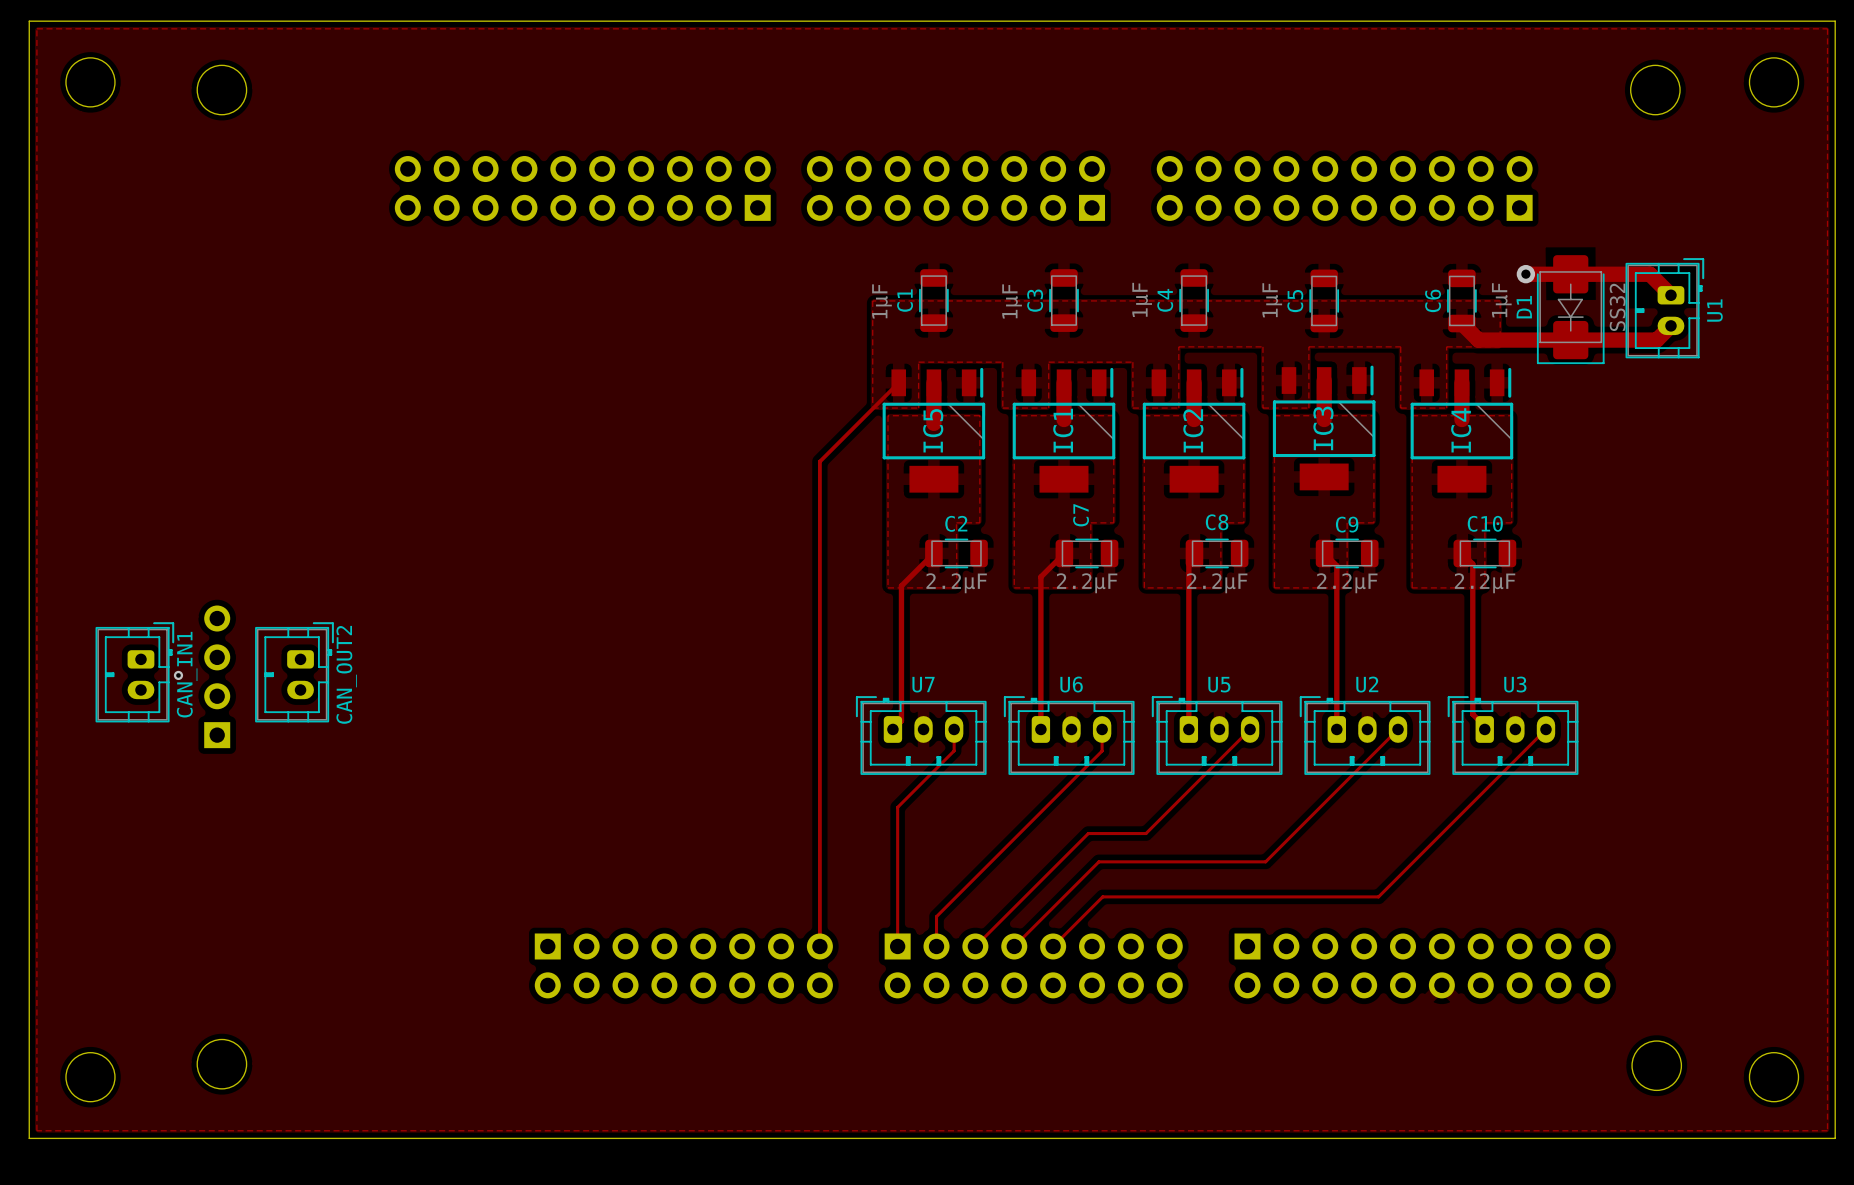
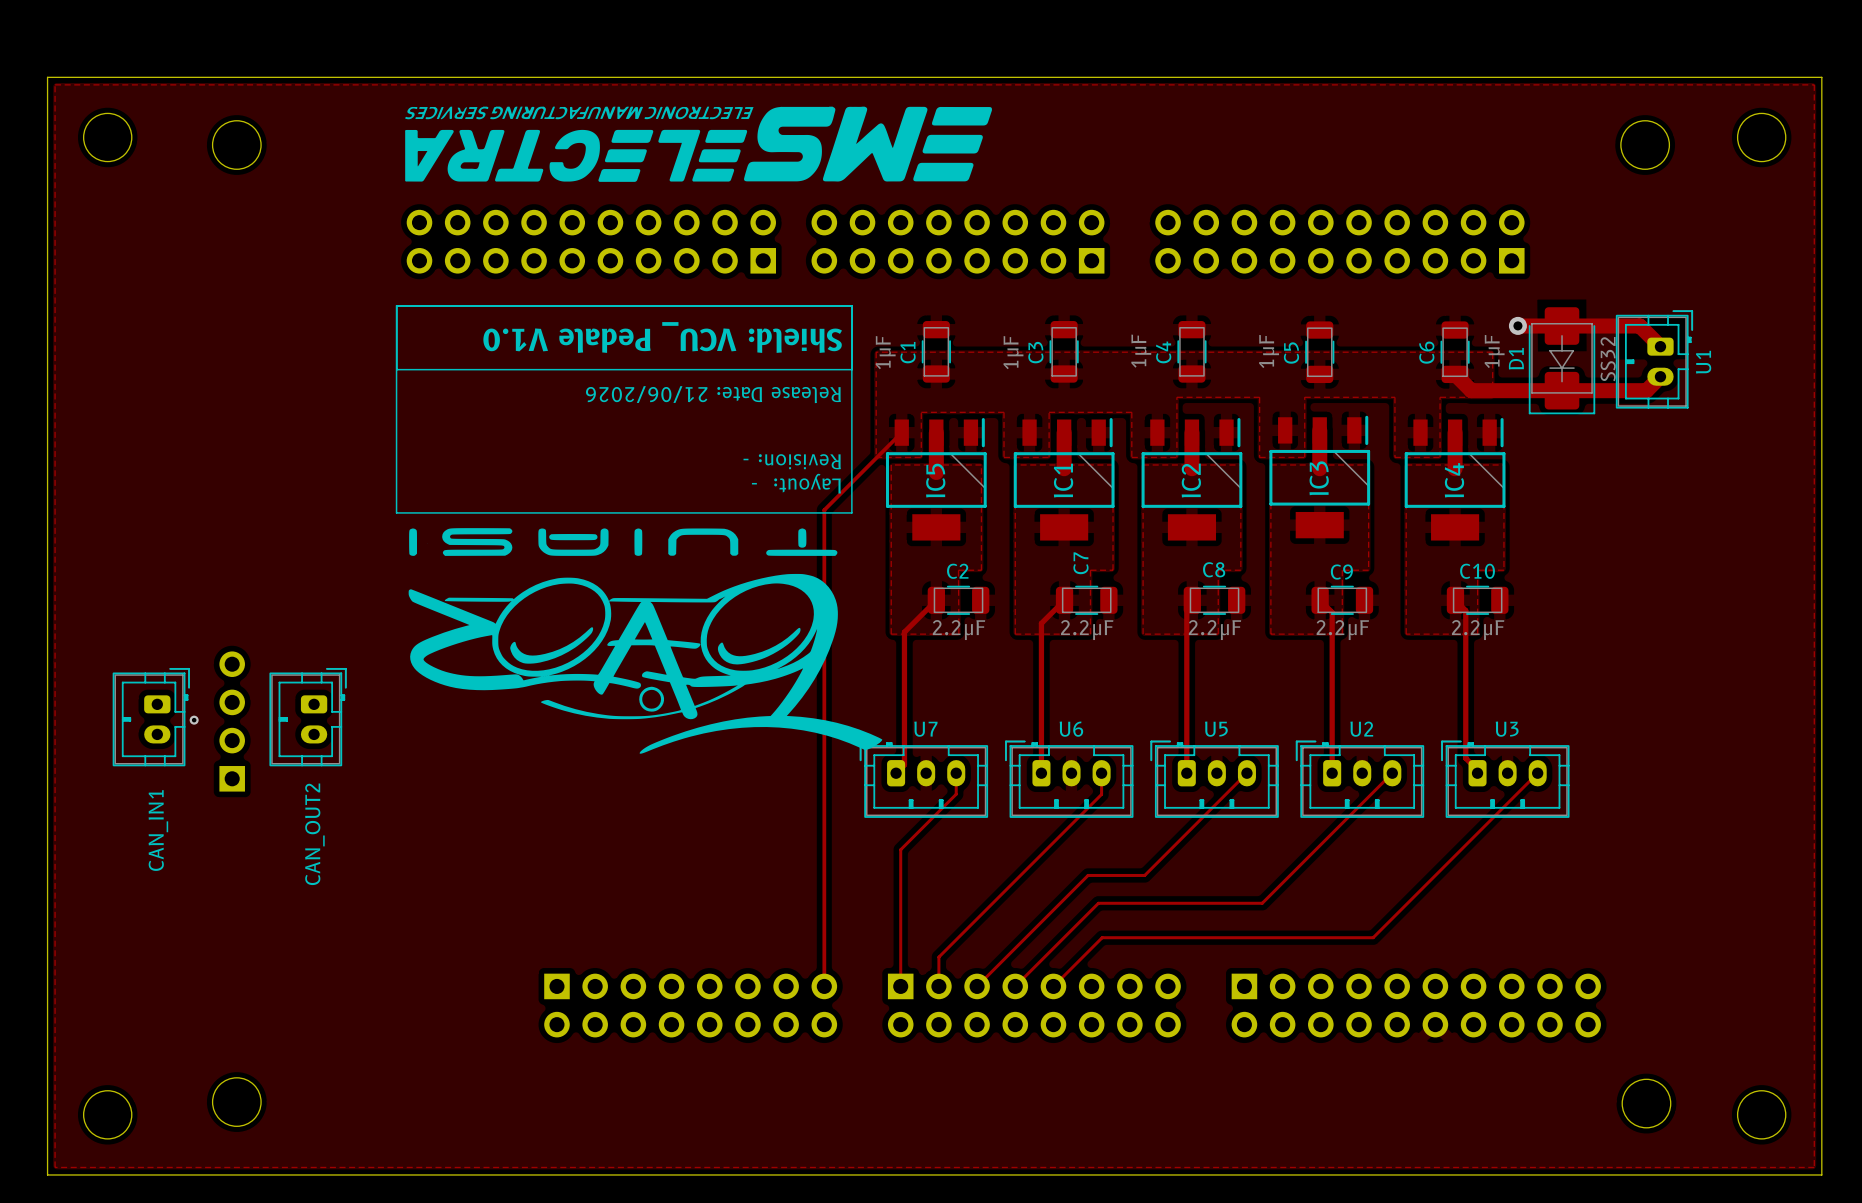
drawing: none -> [405, 106, 992, 182]
line: none -> (396, 305) (396, 369) (851, 369)
line: none -> (396, 305) (396, 512) (851, 512) (851, 305) (396, 305)
text: none -> Shield: VCU_ Pedale V1.0 (662, 337)
text: none -> Release Date: 21/06/2026 (713, 394)
text: none -> Revision: - (792, 461)
text: none -> Layout: - (796, 483)
drawing: none -> [408, 528, 883, 754]
CAN_IN1 name position: CAN_IN1 (187, 674) -> CAN_IN1 (158, 830)
CAN_OUT2 name position: CAN_OUT2 (346, 674) -> CAN_OUT2 (314, 834)

